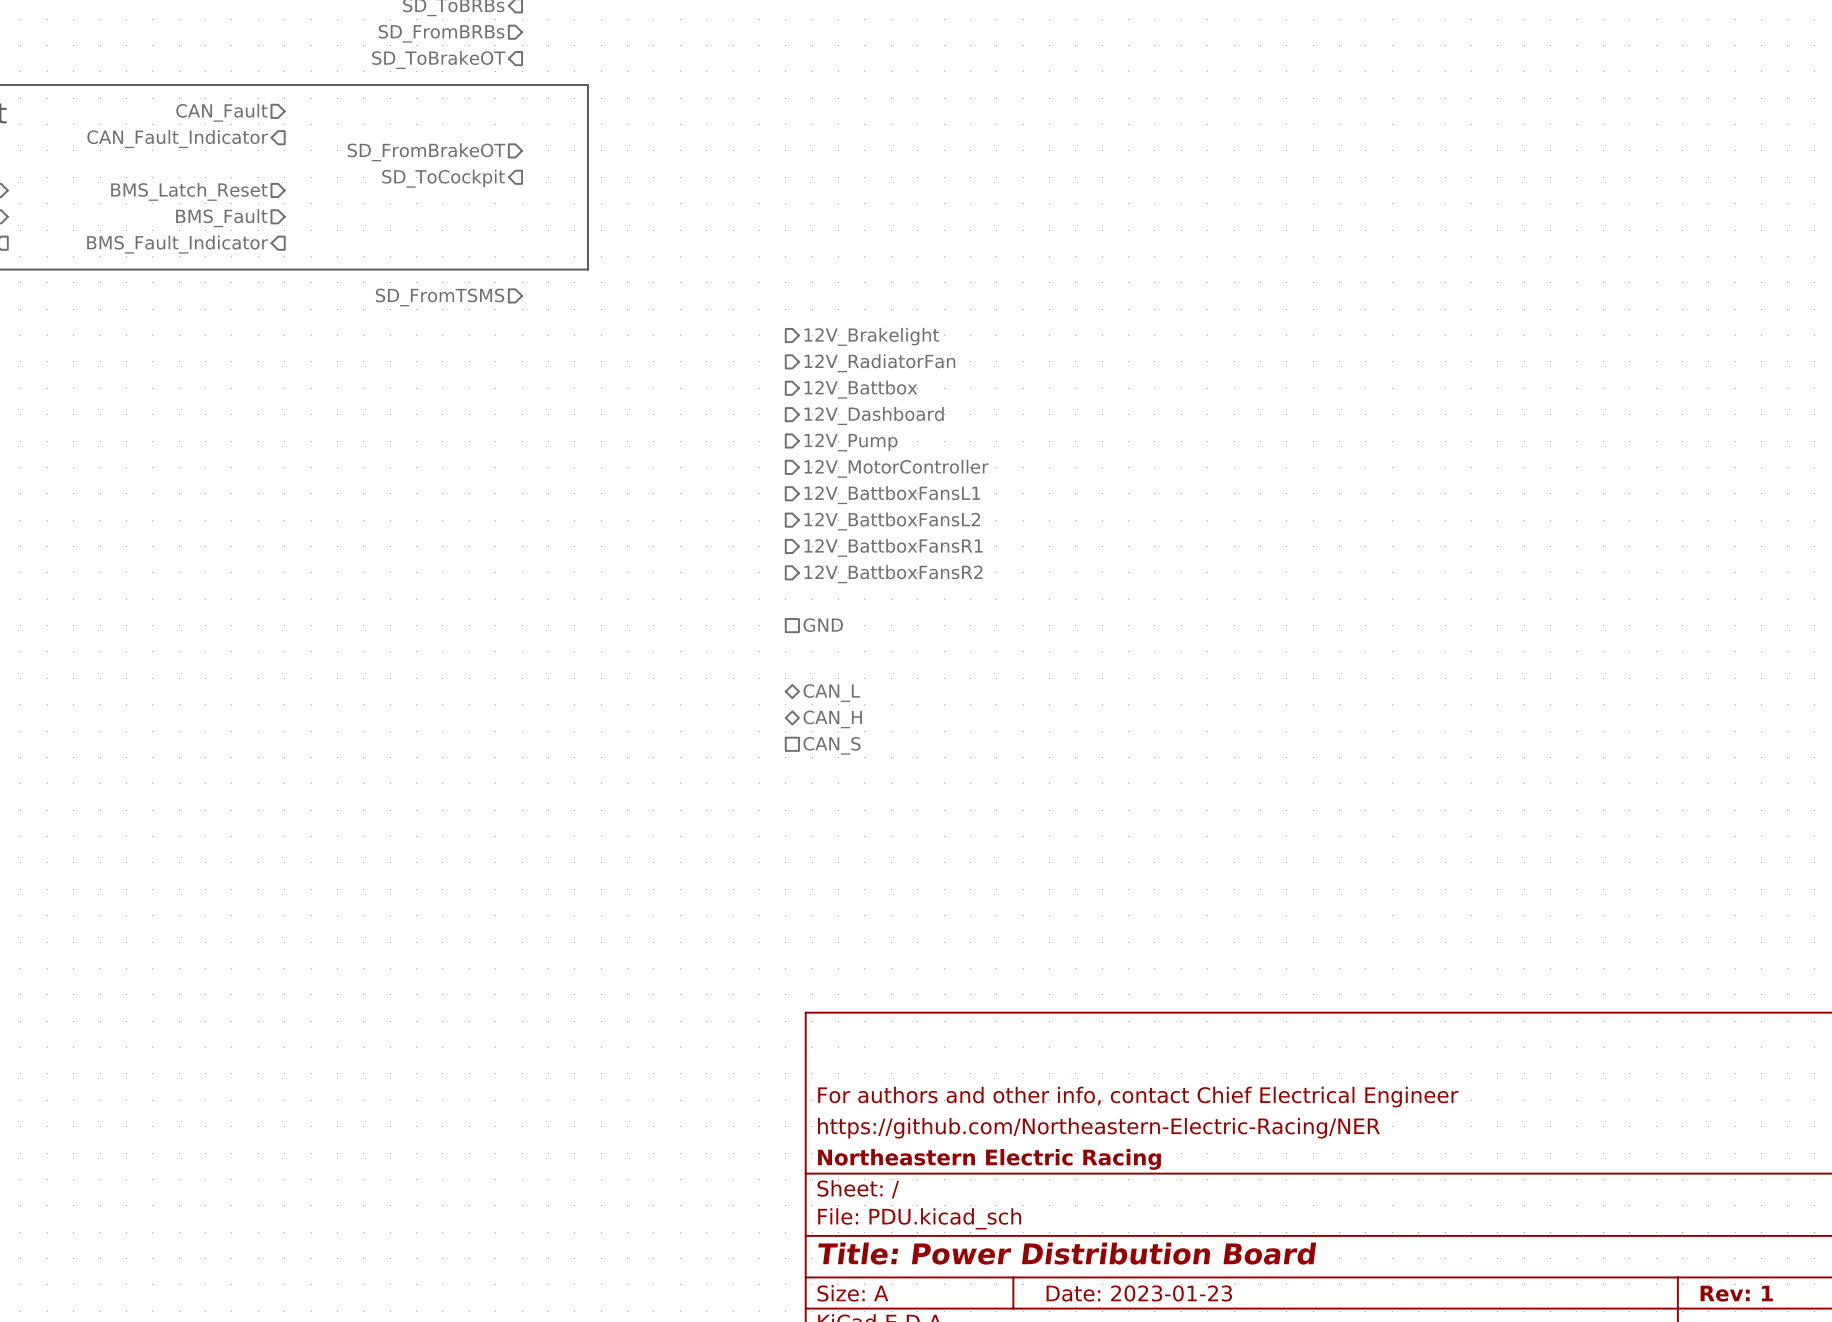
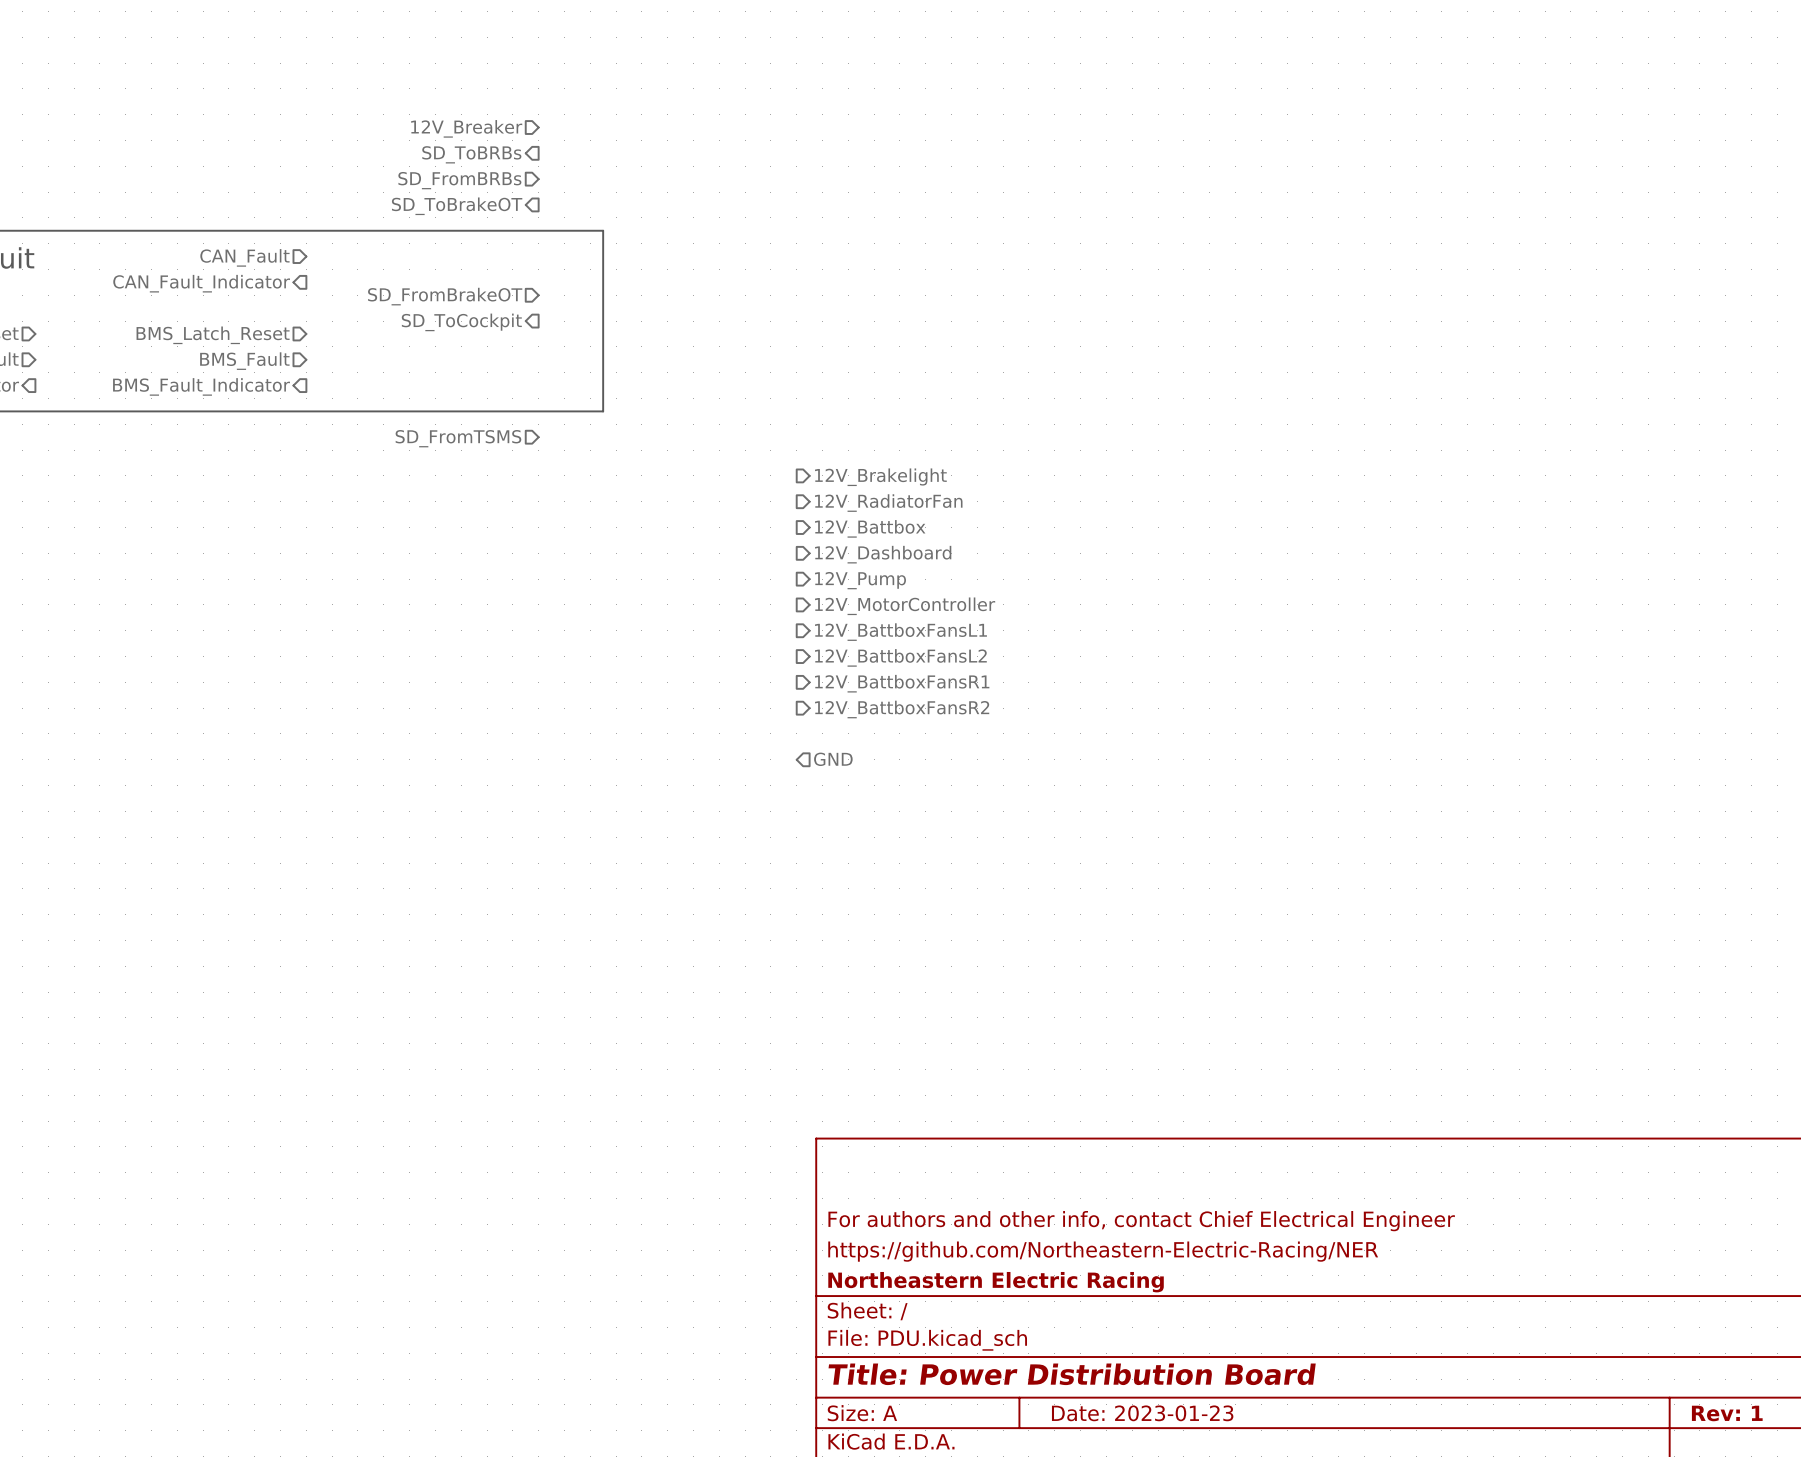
hierarchical label shape: passive (823, 625) -> input (833, 759)
hierarchical label: CAN_L (831, 693) -> none
hierarchical label: CAN_H (832, 719) -> none
hierarchical label: CAN_S (832, 745) -> none

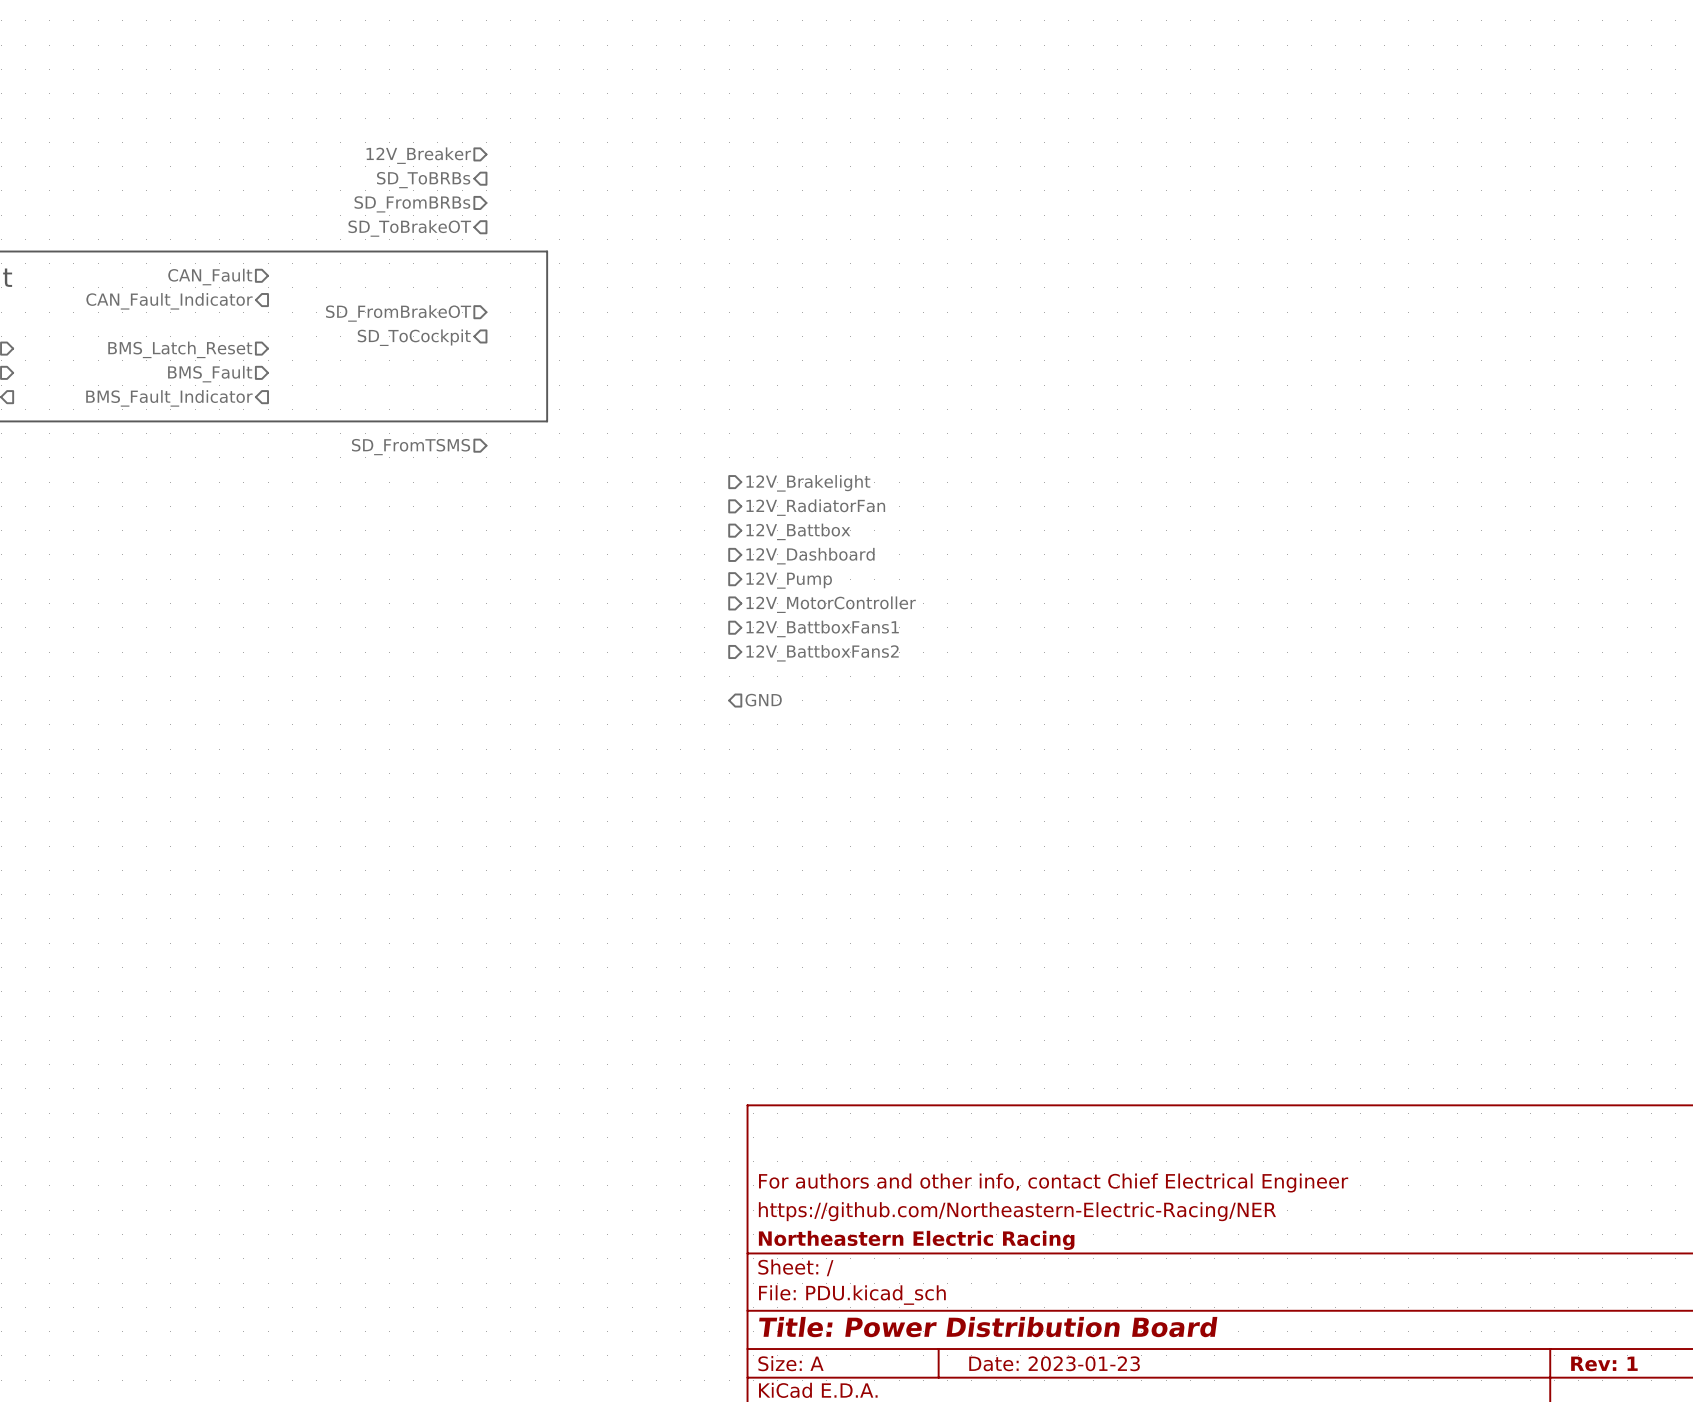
hierarchical label: 12V_BattboxFansL1 (900, 632) -> 12V_BattboxFans1 (822, 628)
hierarchical label: 12V_BattboxFansL2 (900, 657) -> 12V_BattboxFans2 (822, 653)
hierarchical label: 12V_BattboxFansR1 (902, 683) -> none
hierarchical label shape: output (902, 709) -> input (763, 700)
hierarchical label: 12V_BattboxFansR2 (902, 709) -> GND (763, 700)
hierarchical label: GND (833, 759) -> none

